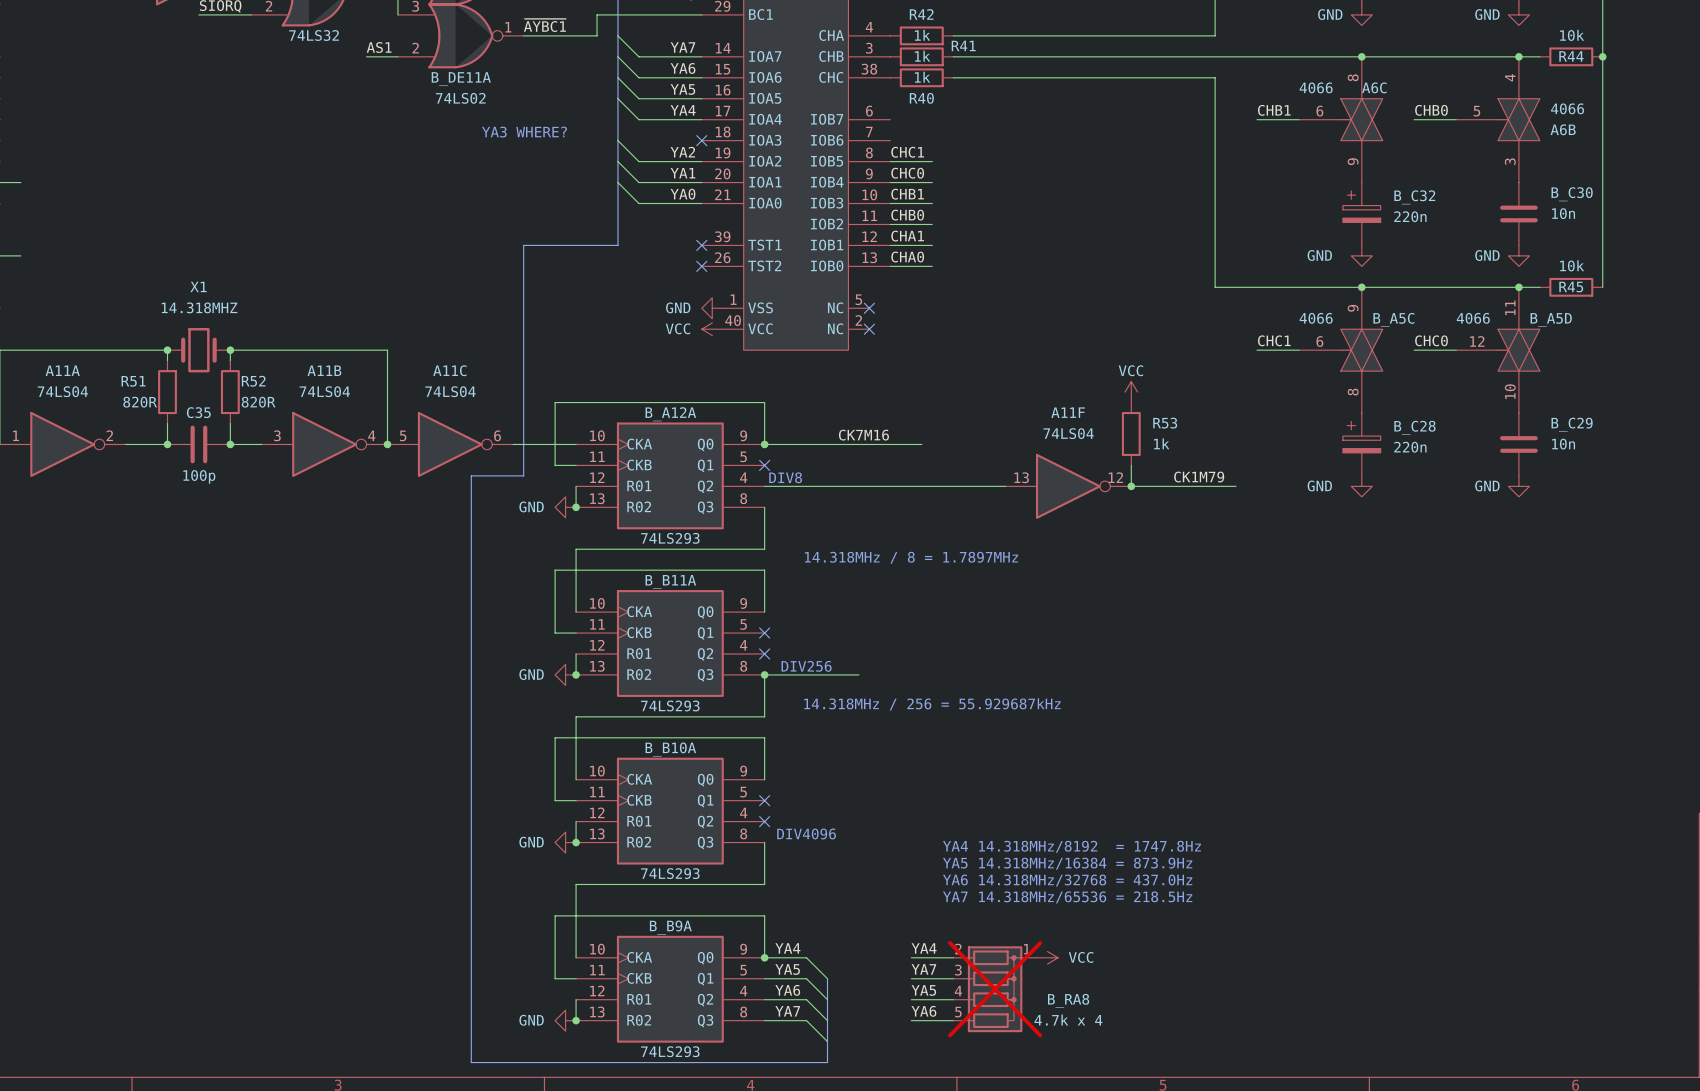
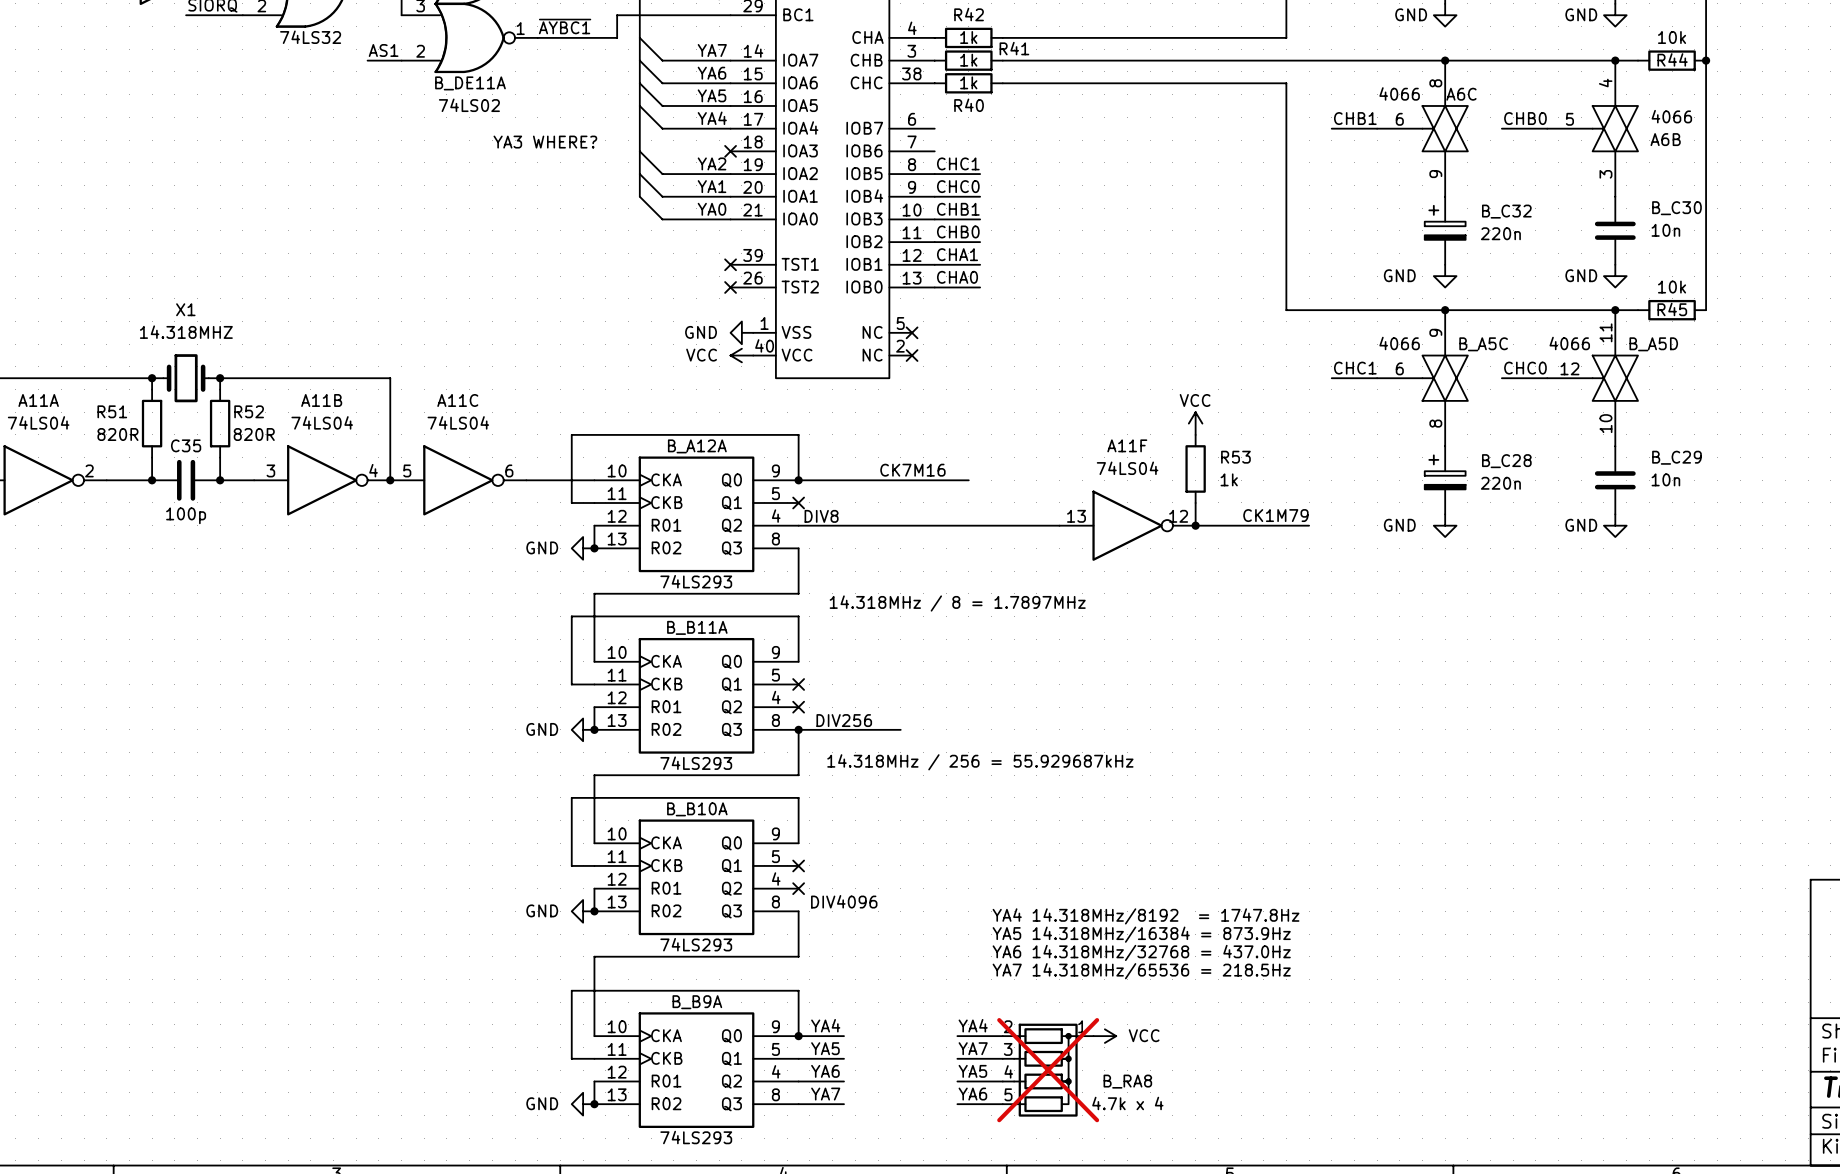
bus: (617, 182) (617, 245) (523, 245) (523, 475) (471, 475) (471, 1062) (827, 1062) (827, 978) -> none
wire: (806, 957) (827, 978) -> none
wire: (806, 978) (827, 999) -> none
wire: (806, 999) (827, 1020) -> none
wire: (806, 1020) (827, 1041) -> none

